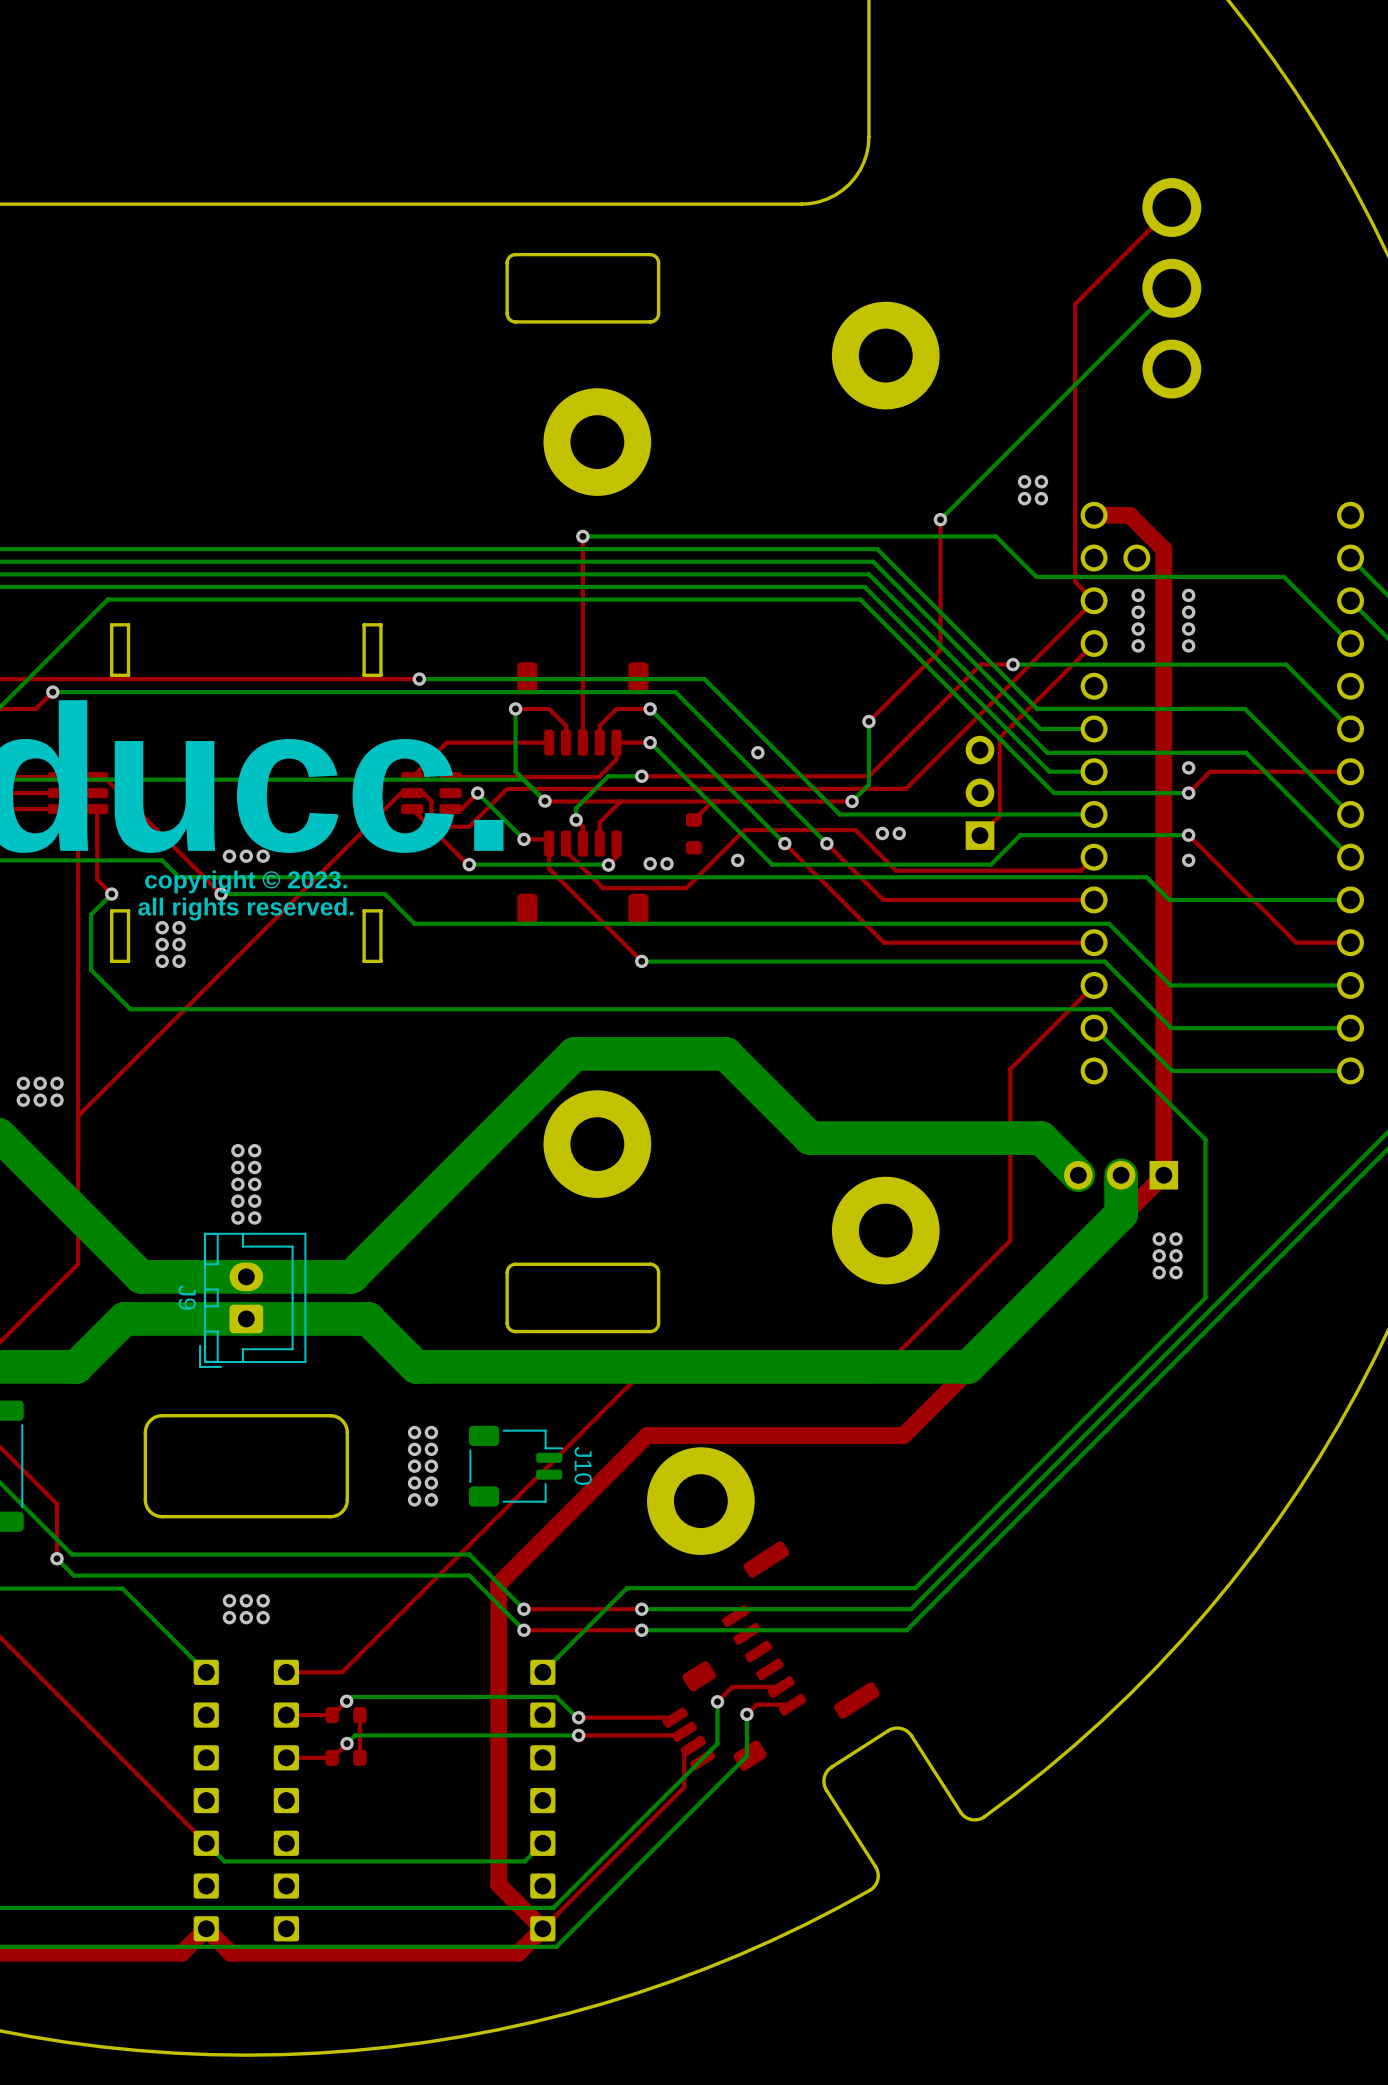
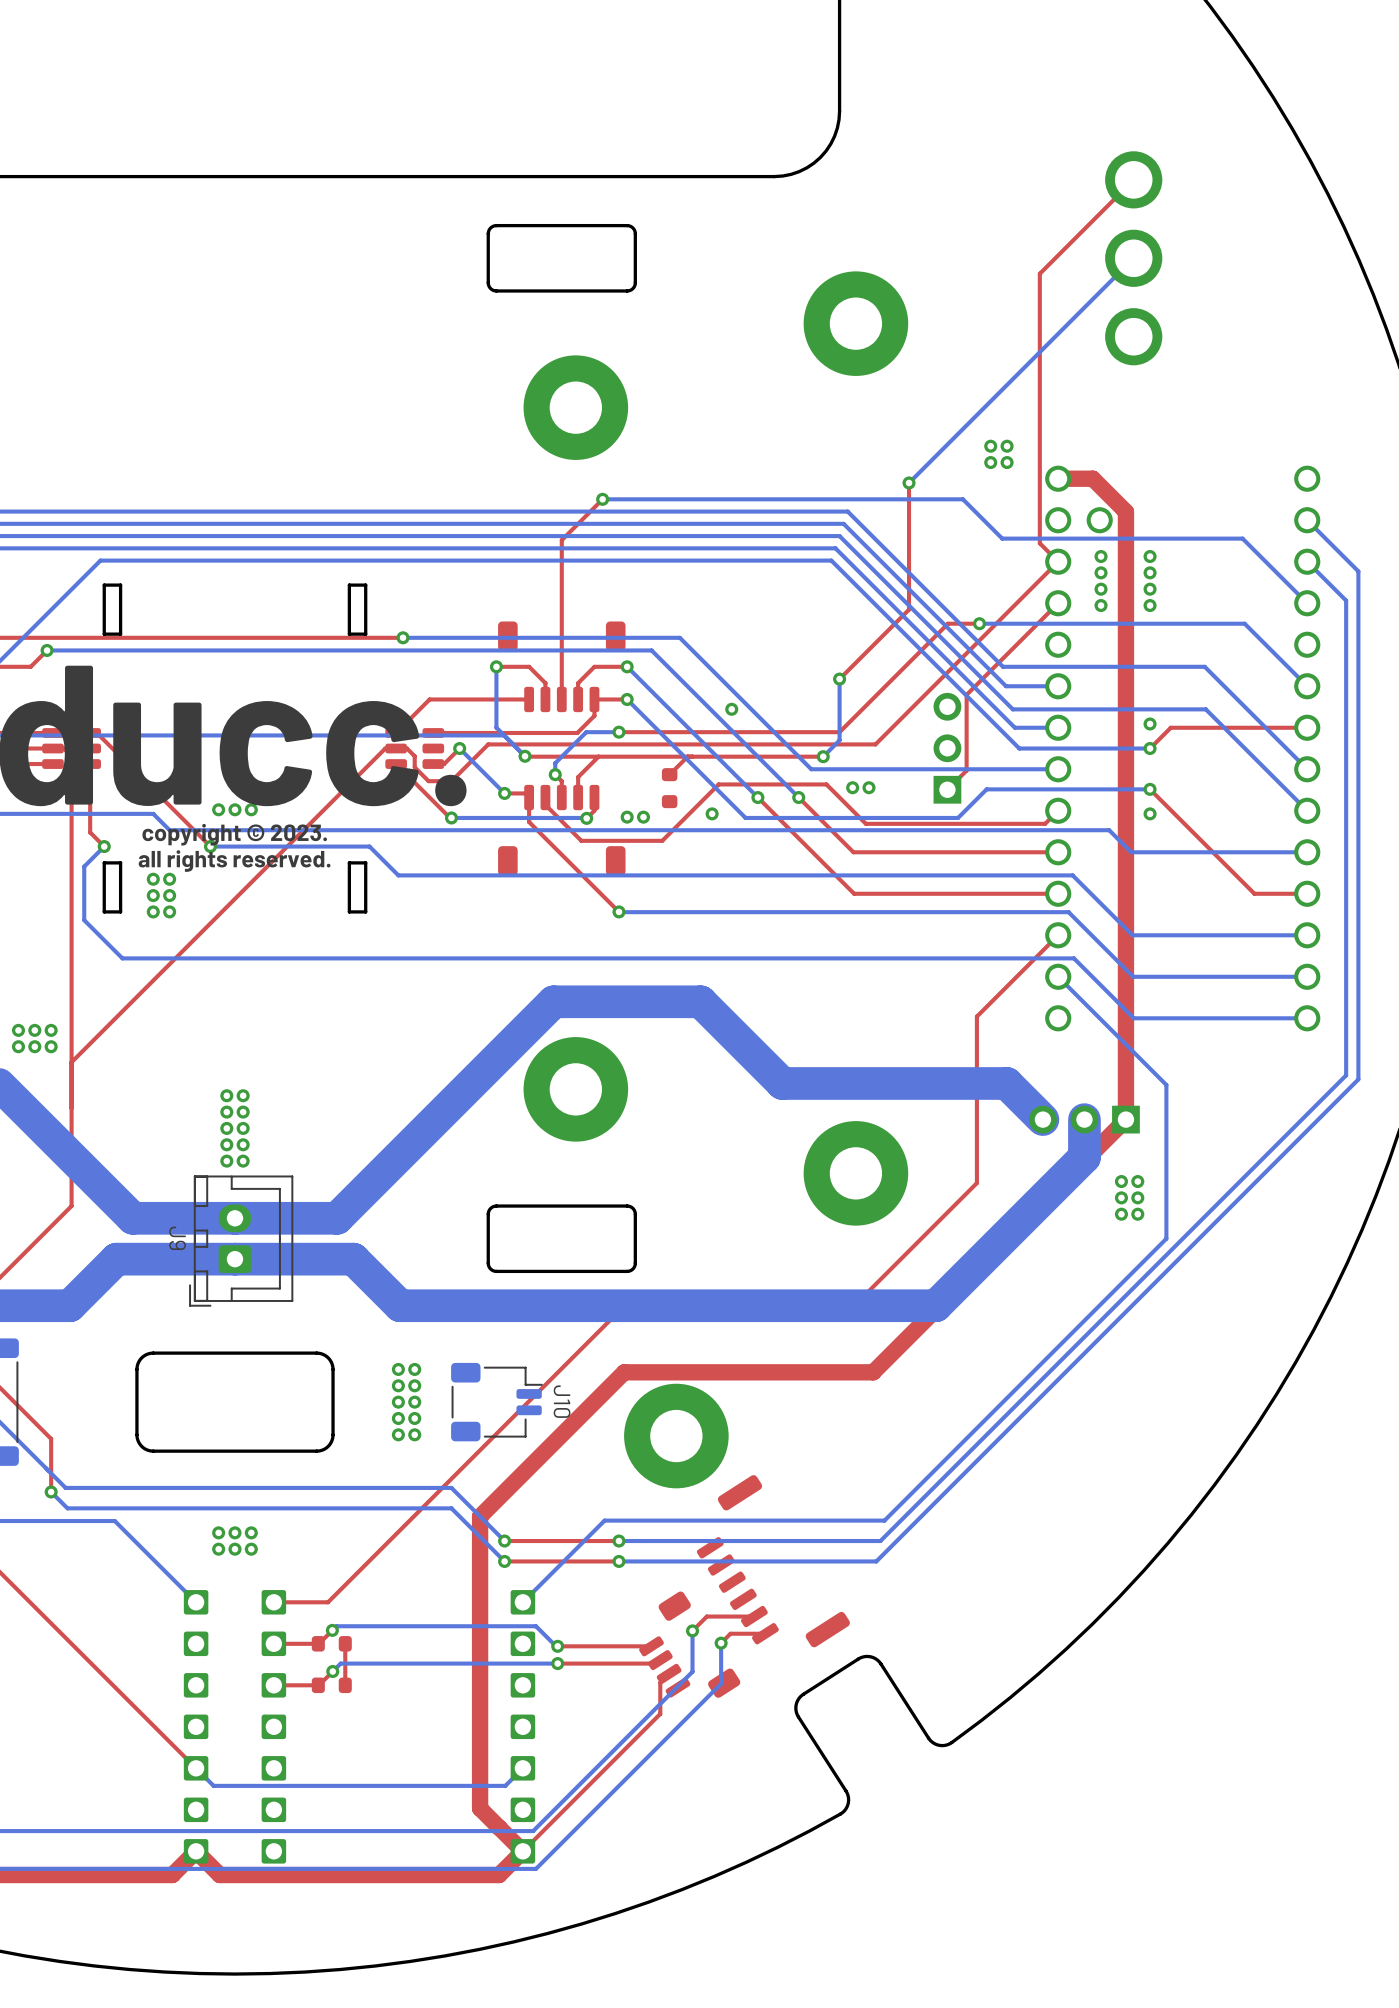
top track: (582, 536) (582, 578) -> (602, 499) (561, 540)
via position: (582, 536) -> (602, 499)
bottom track: (624, 536) (582, 536) -> none

